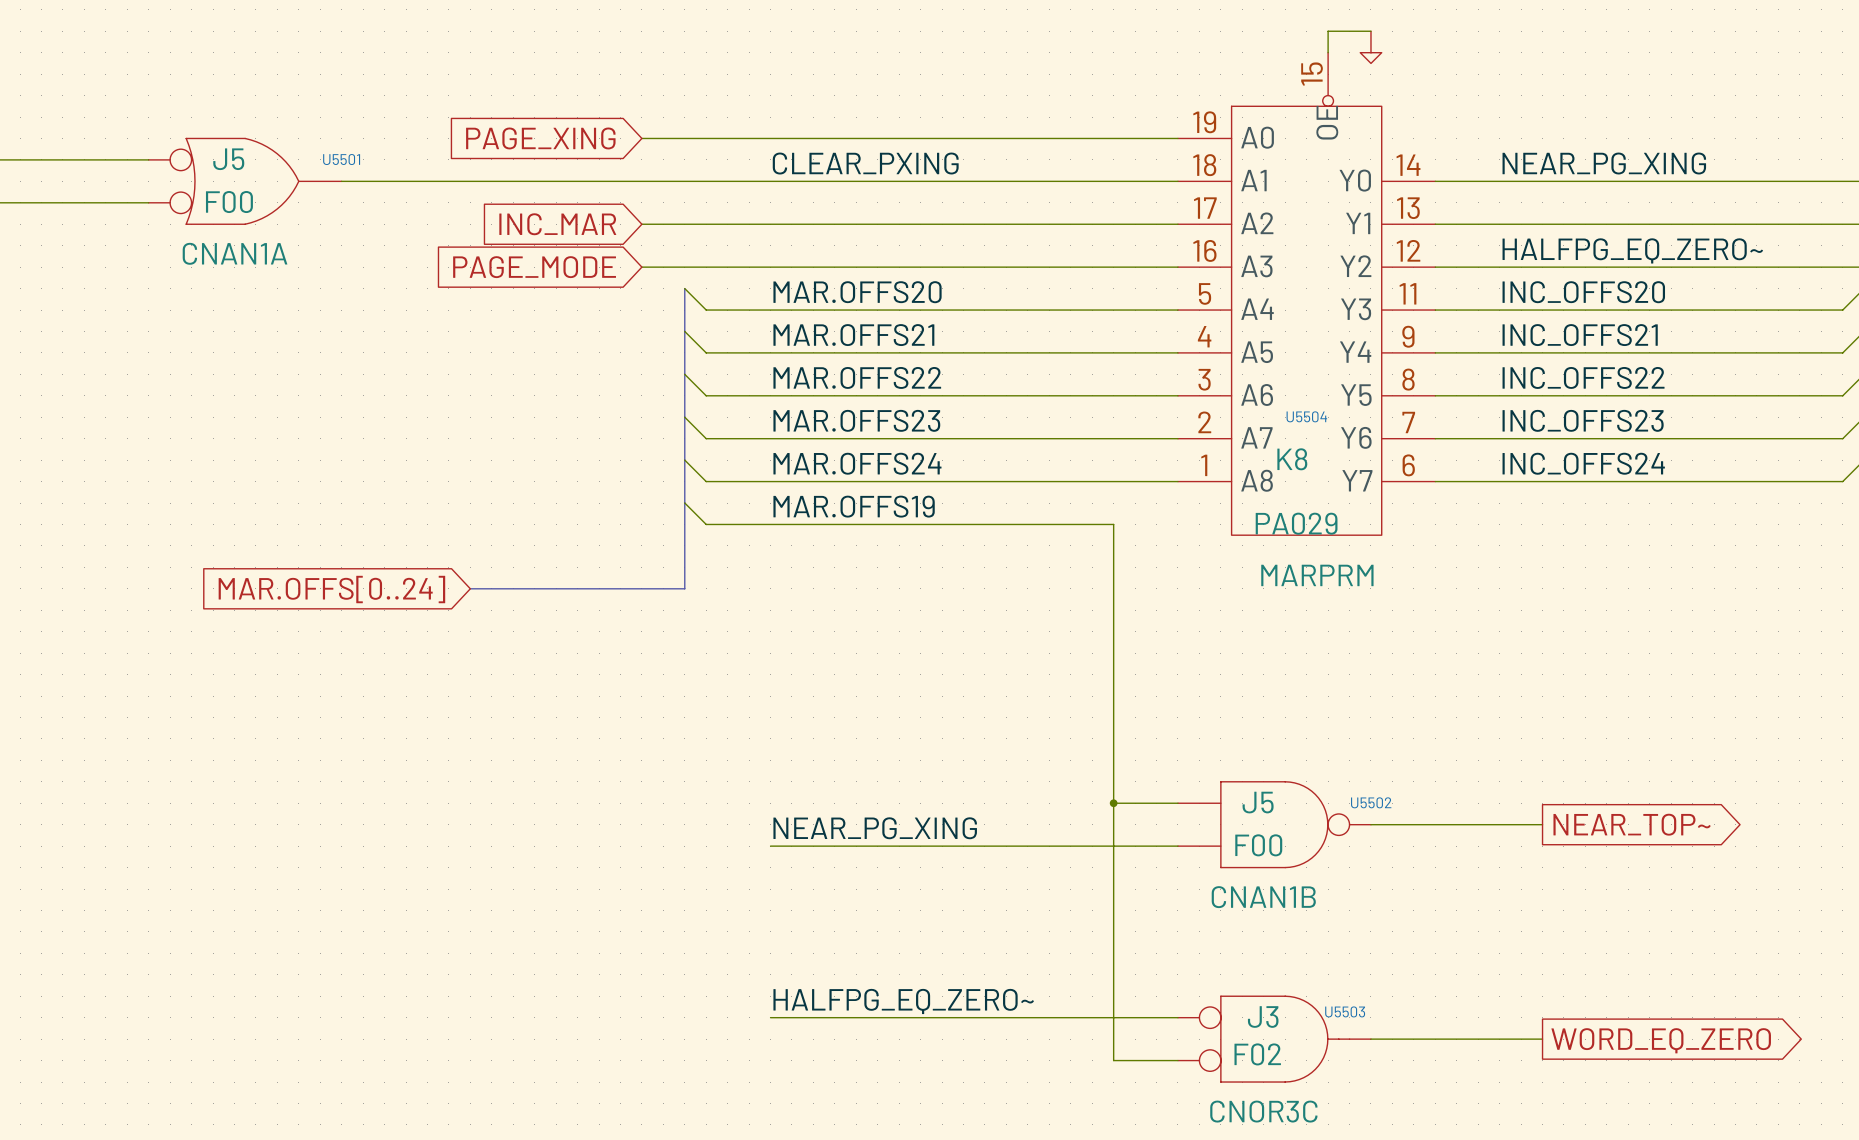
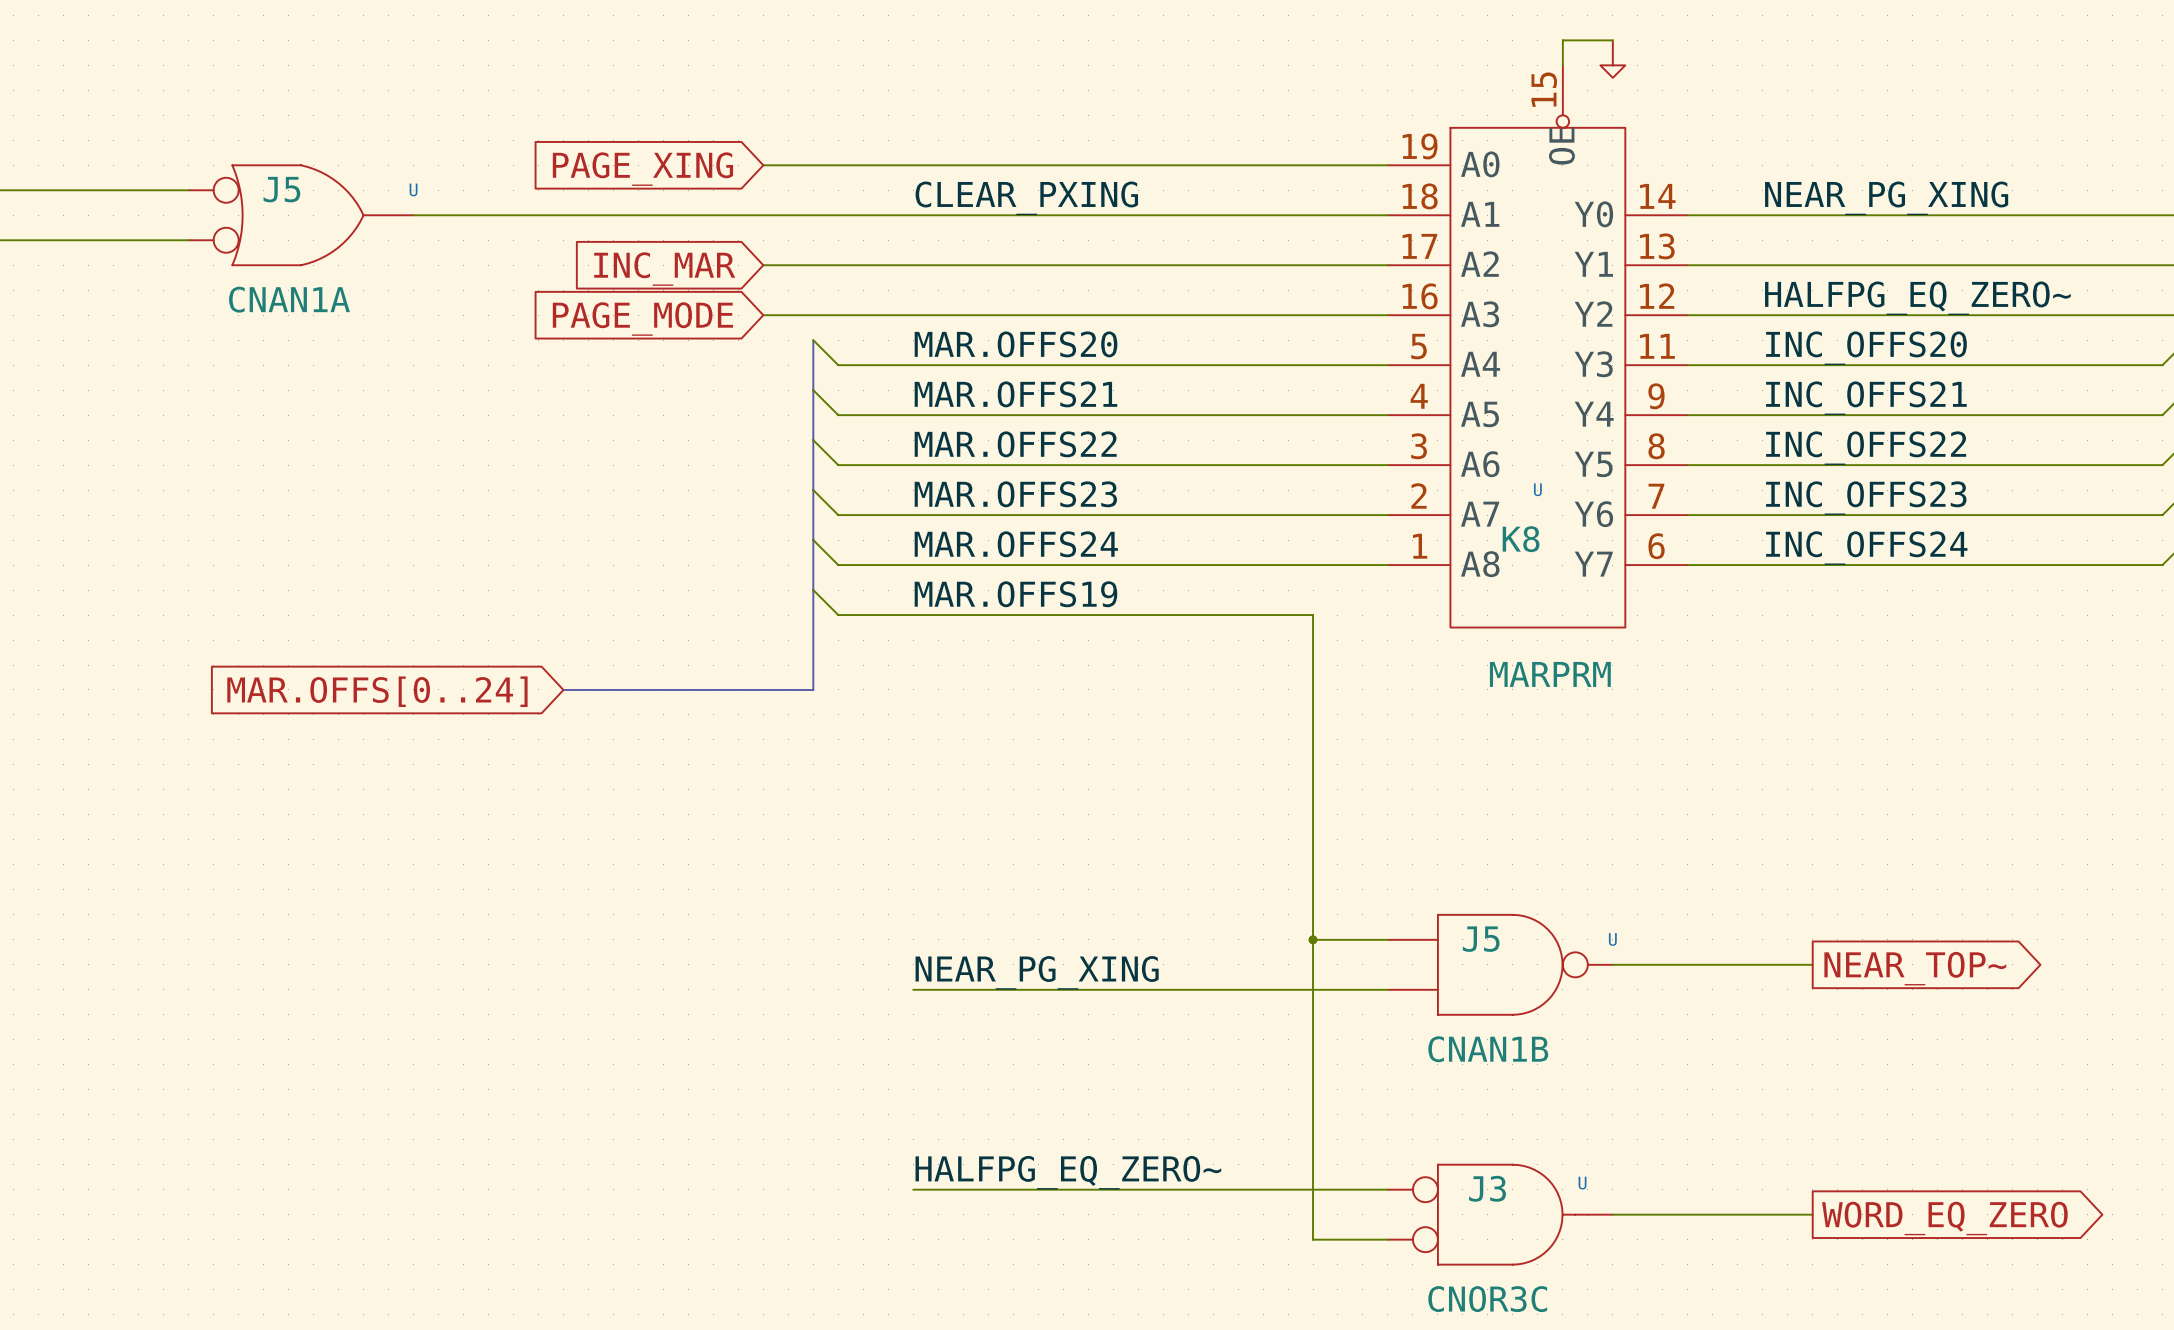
U5501 name: U5501 (341, 159) -> U (413, 189)
U5501 value: F00 (229, 202) -> none
U5504 name: U5504 (1306, 416) -> U (1537, 489)
U5504 value: PA029 (1296, 523) -> none
U5502 name: U5502 (1371, 802) -> U (1612, 939)
U5502 value: F00 (1258, 845) -> none
U5503 name: U5503 (1345, 1011) -> U (1582, 1183)
U5503 value: F02 (1257, 1054) -> none

